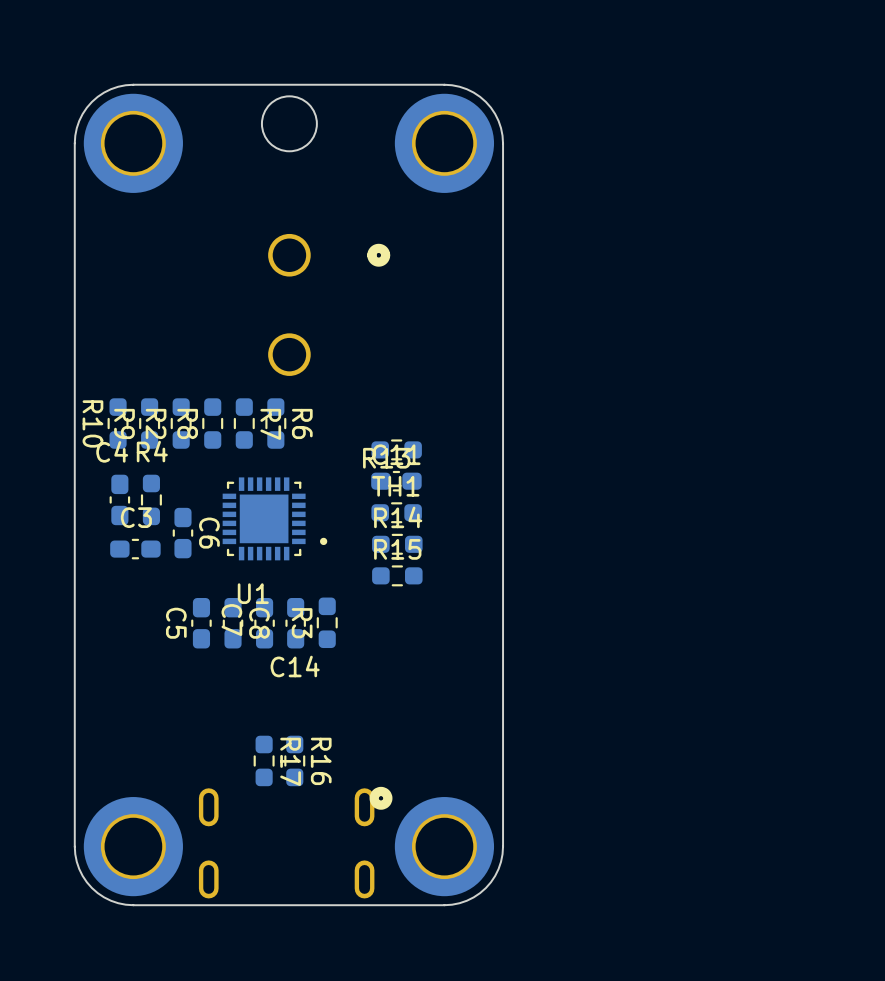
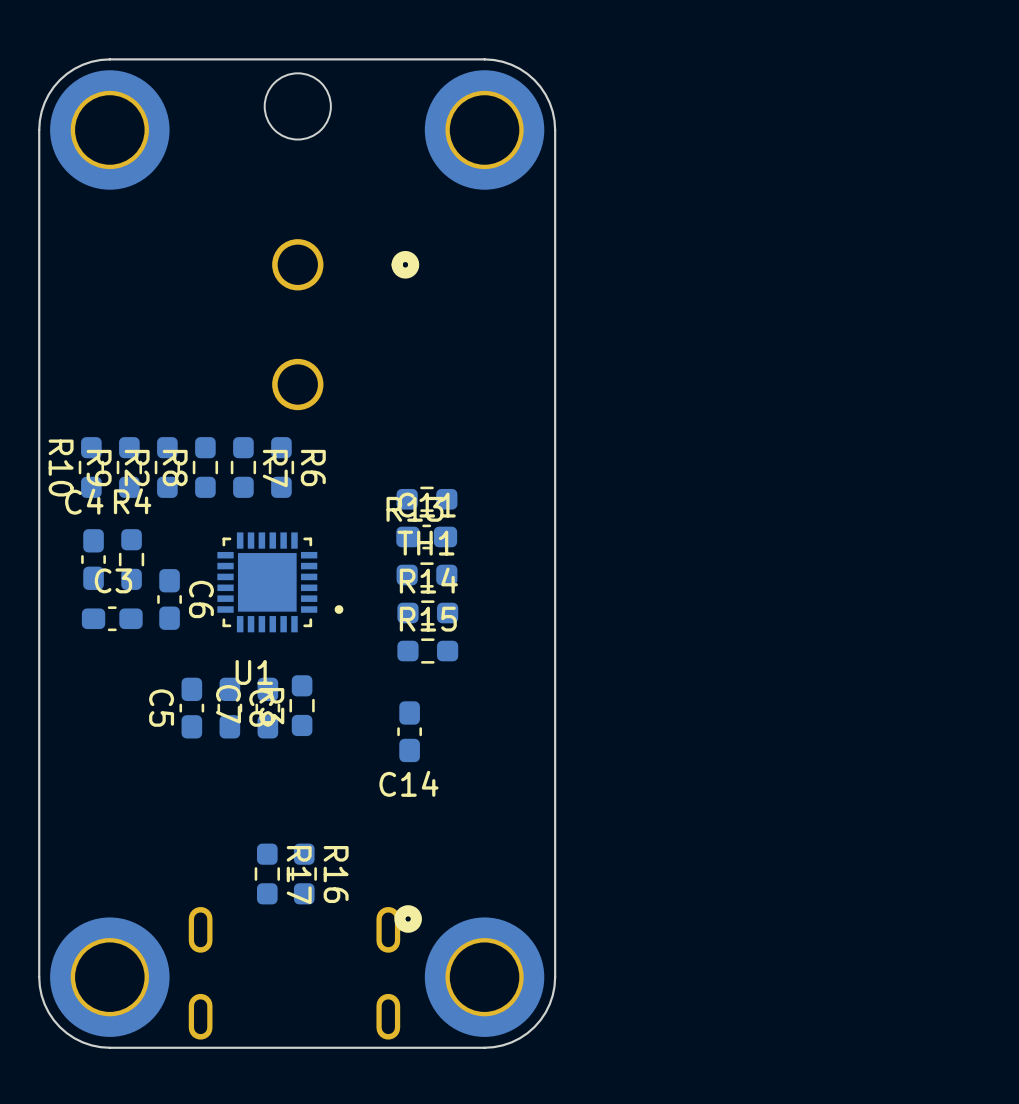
R3 position: (327, 622) -> (302, 705)
C14 position: (295, 623) -> (409, 731)

